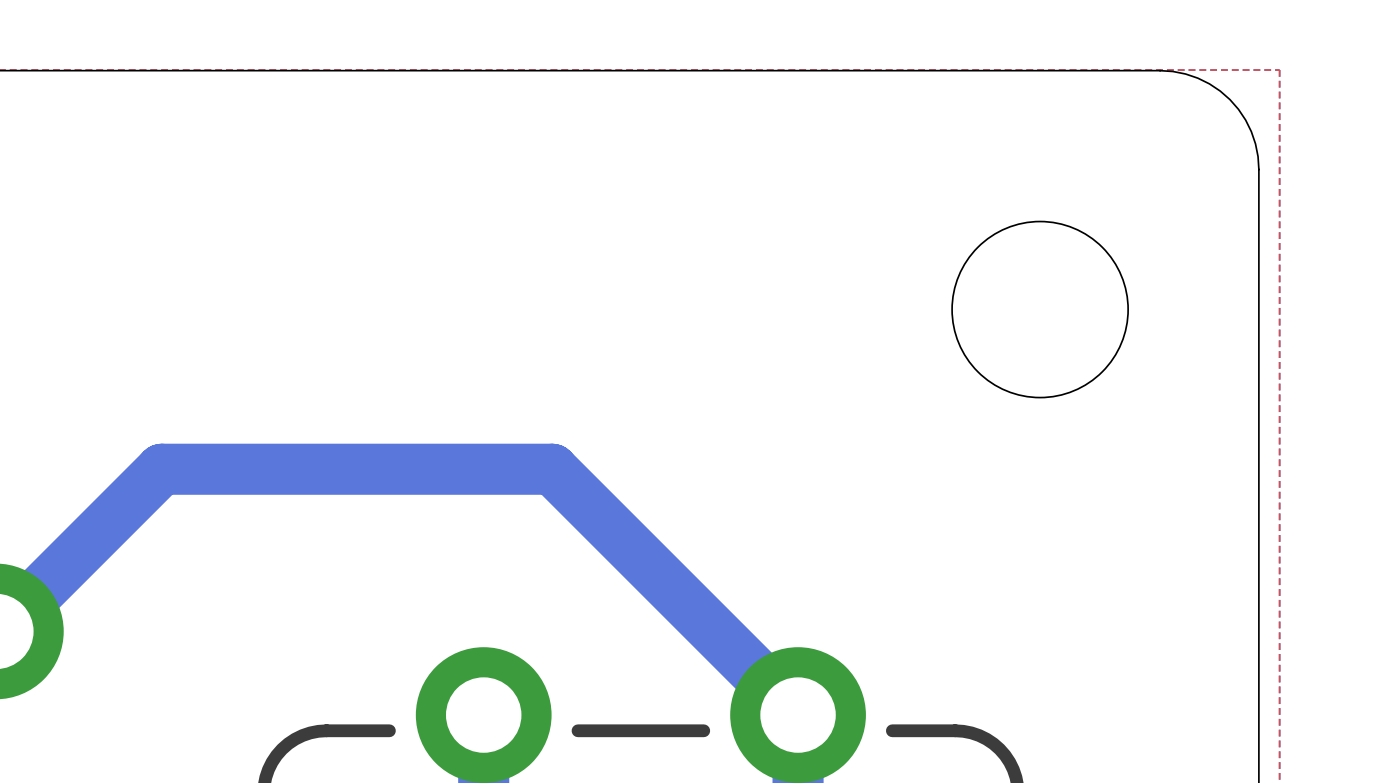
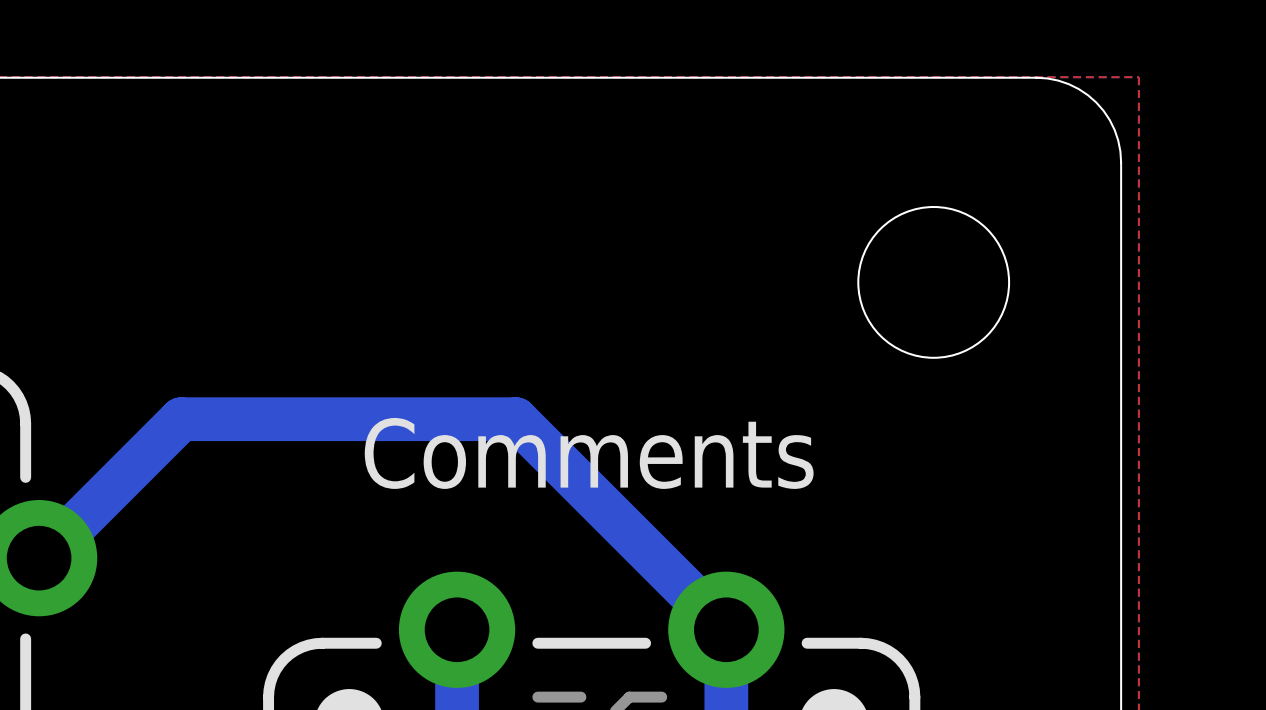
text: none -> Comments (589, 453)

